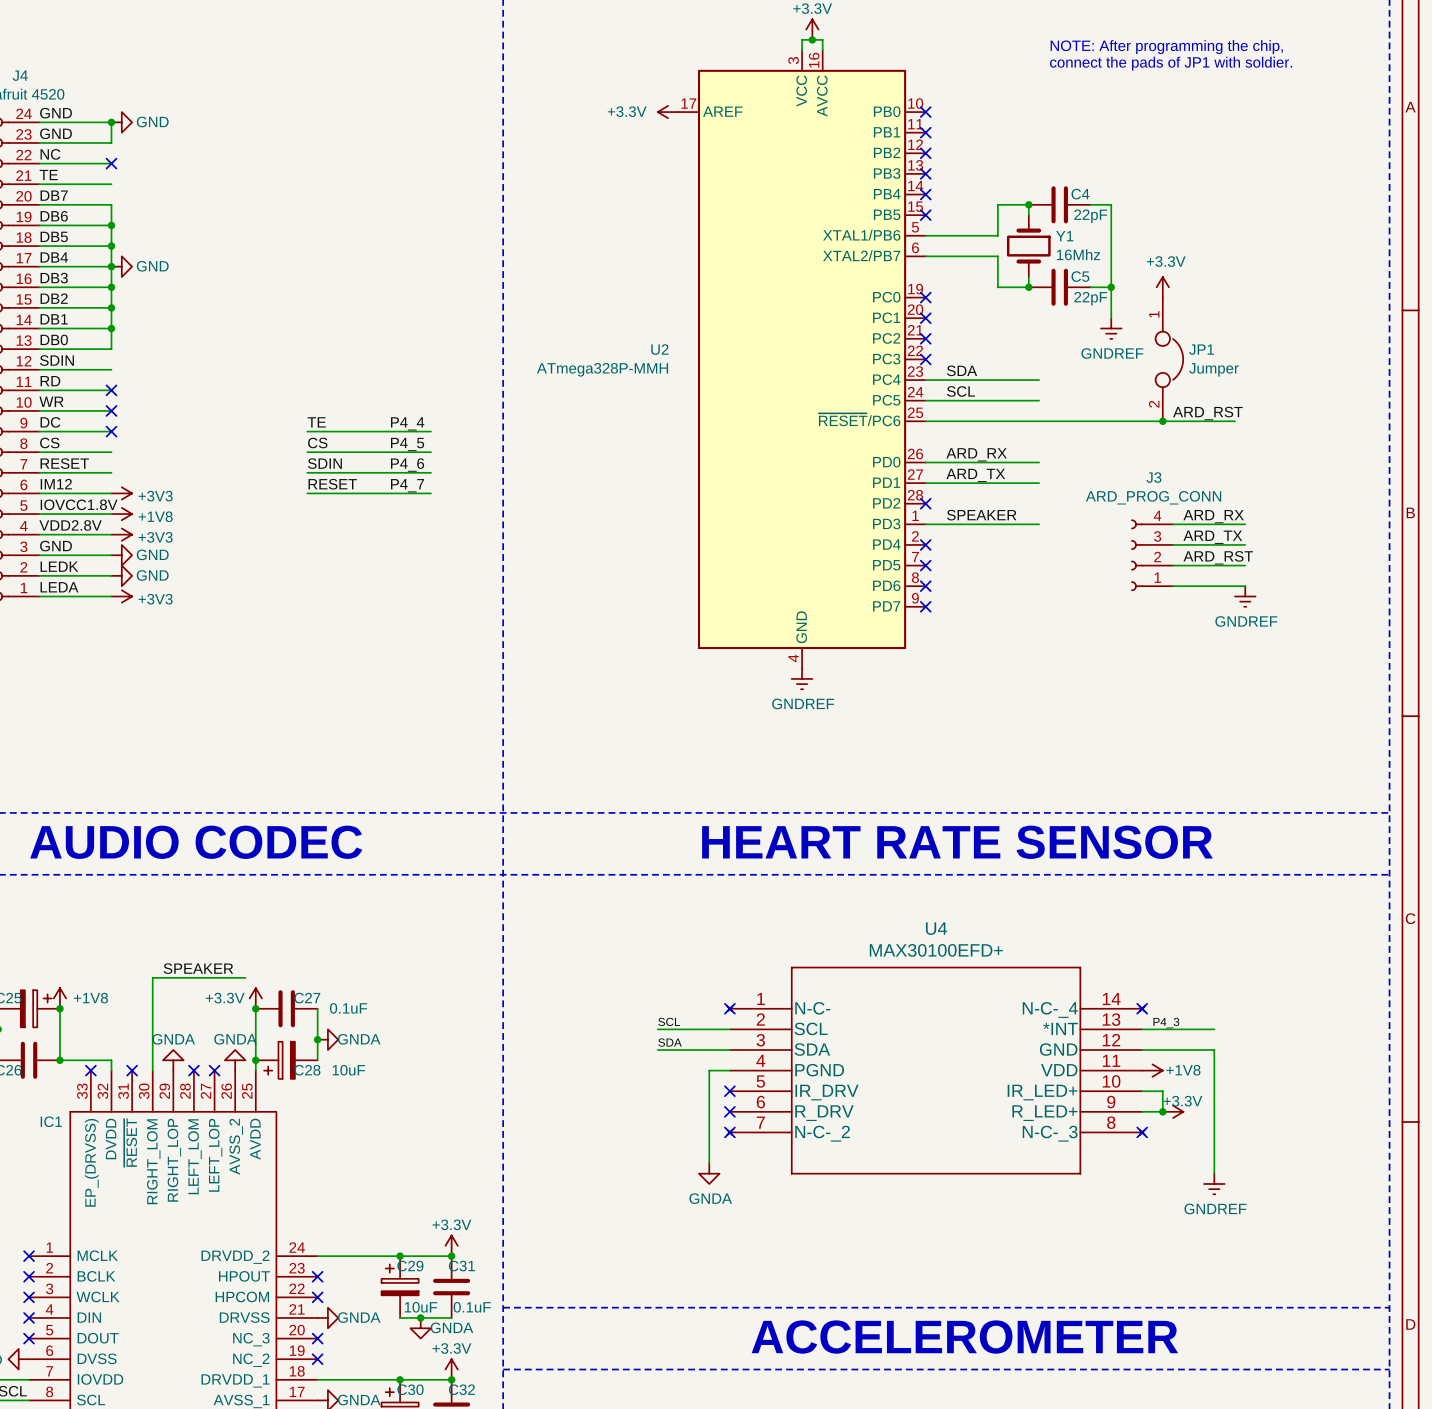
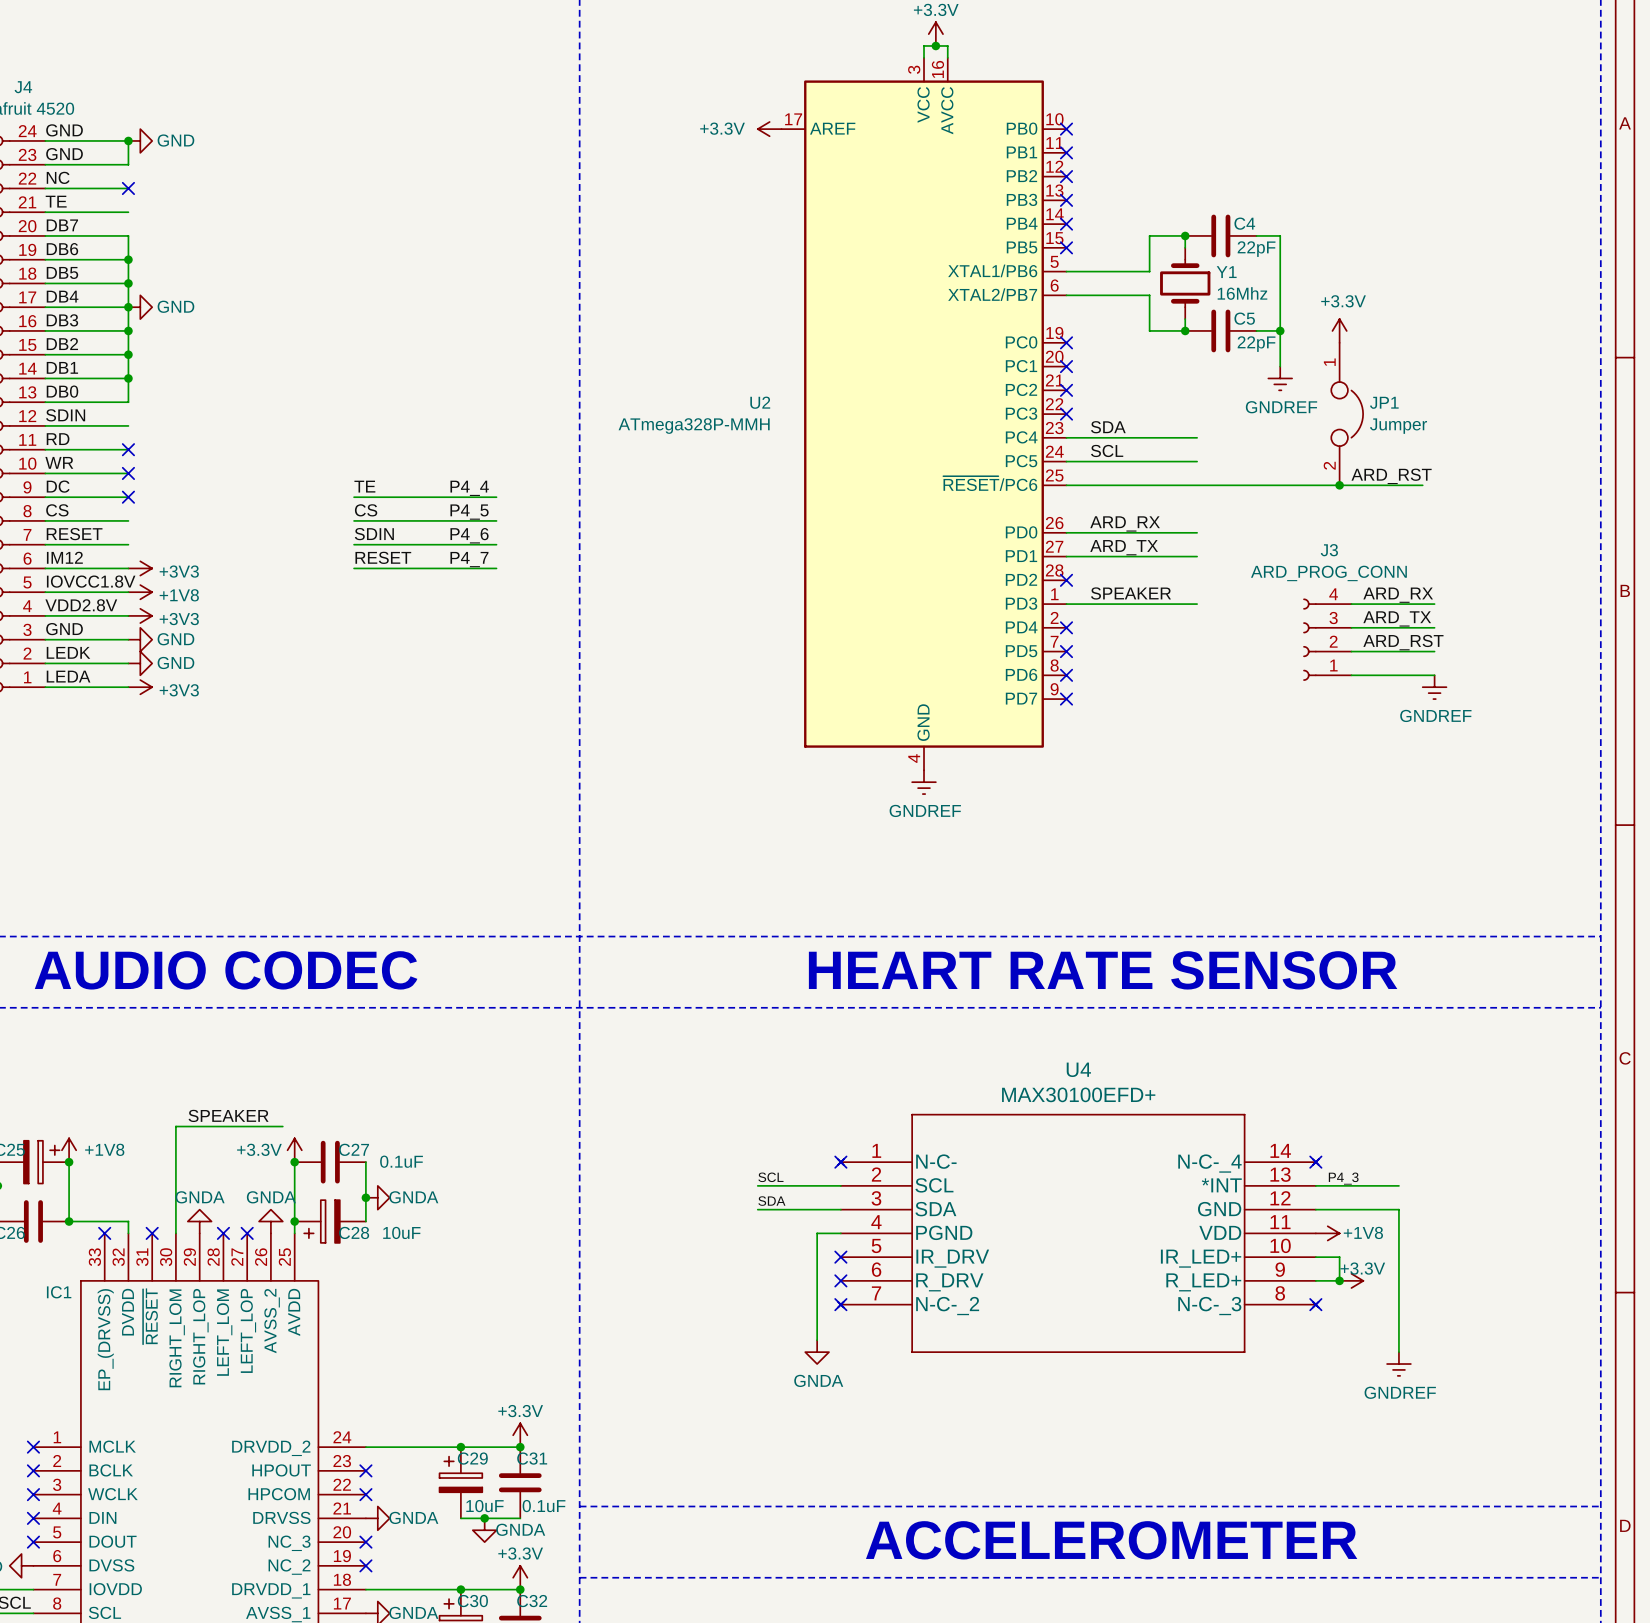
text: NOTE: After programming the chip, (1166, 47) -> none
text: connect the pads of JP1 with soldier. (1171, 63) -> none

